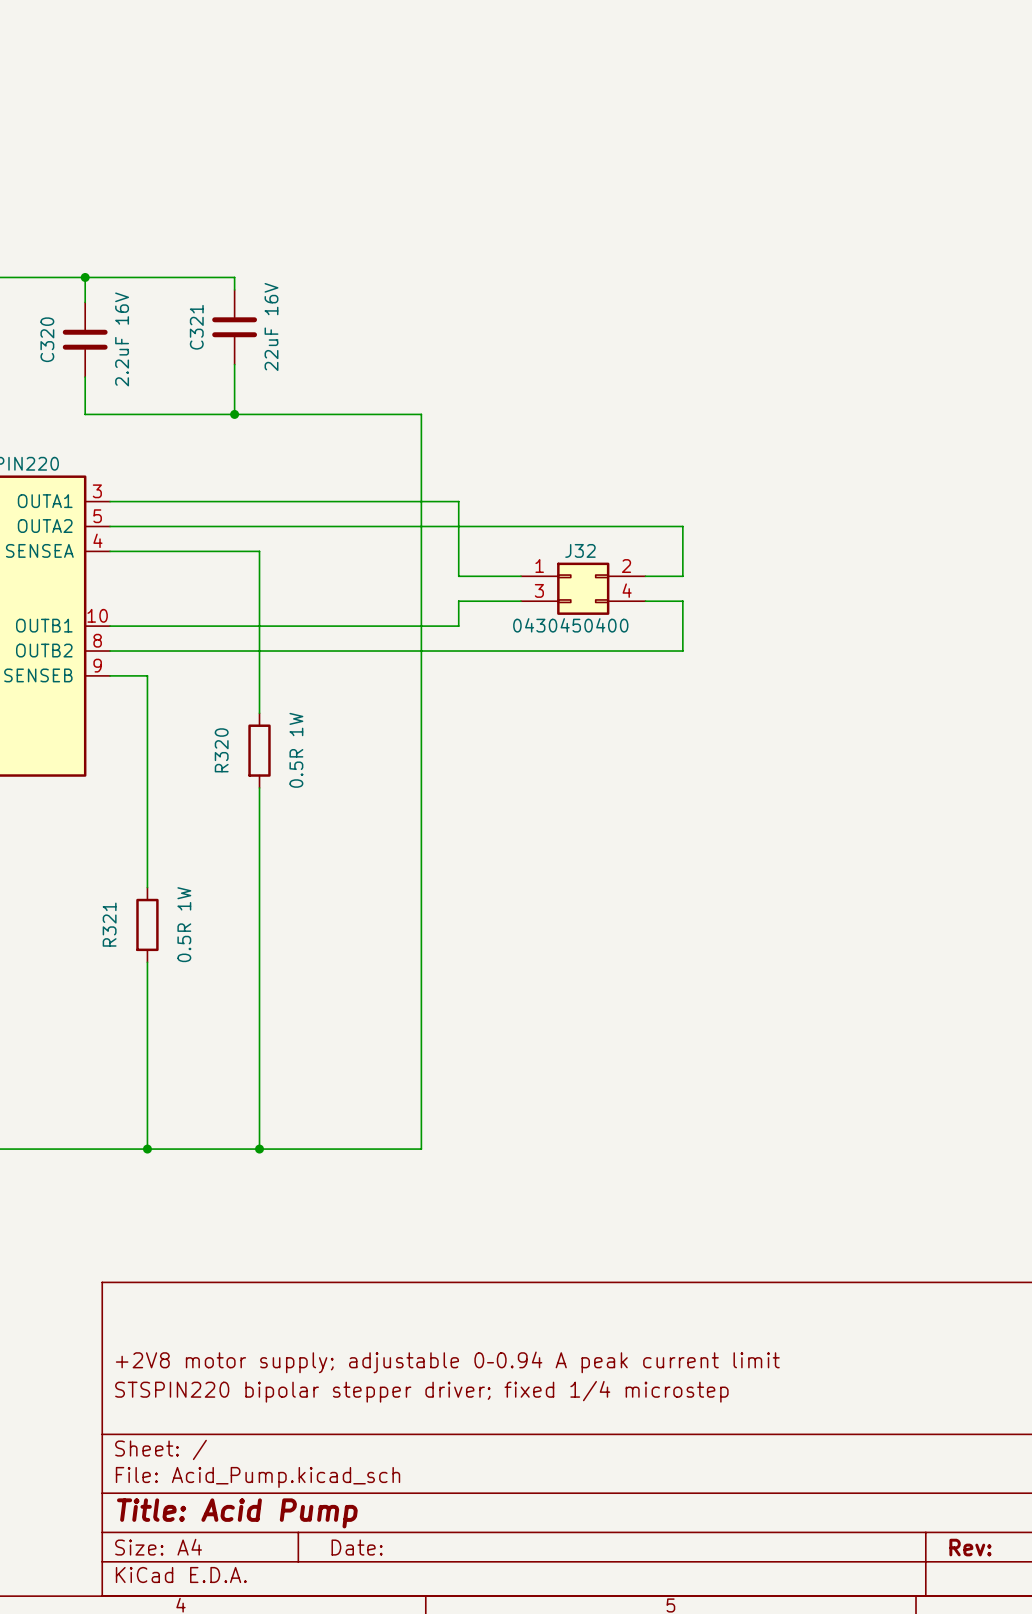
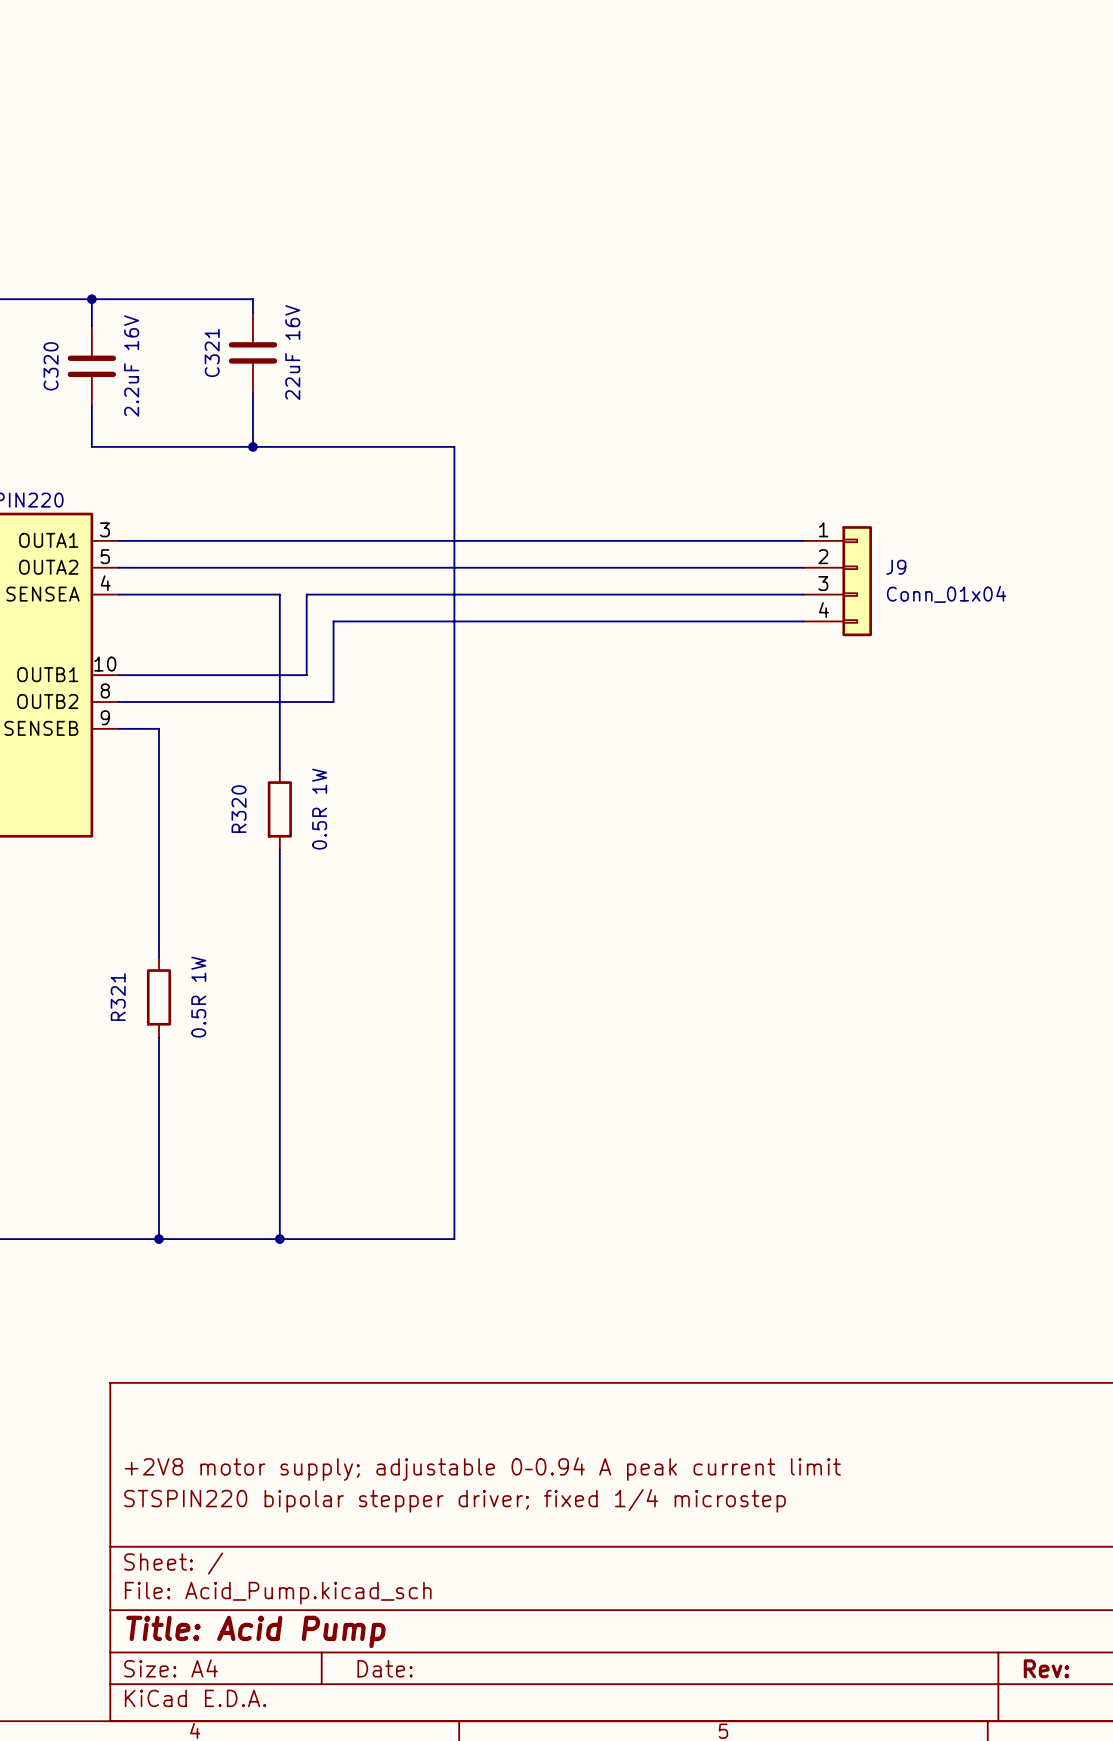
wire: (458, 501) (458, 576) -> (494, 540) (803, 540)
wire: (682, 526) (682, 576) -> (736, 567) (803, 567)
J9: none -> Conn_01x04 (837, 581)
wire: none -> (736, 621) (803, 621)
J32: 0430450400 (583, 588) -> none
wire: (520, 601) (458, 601) (458, 626) (284, 626) -> (803, 594) (306, 594) (306, 675)
wire: (645, 601) (682, 601) (682, 651) (309, 651) -> (494, 621) (333, 621) (333, 702)

